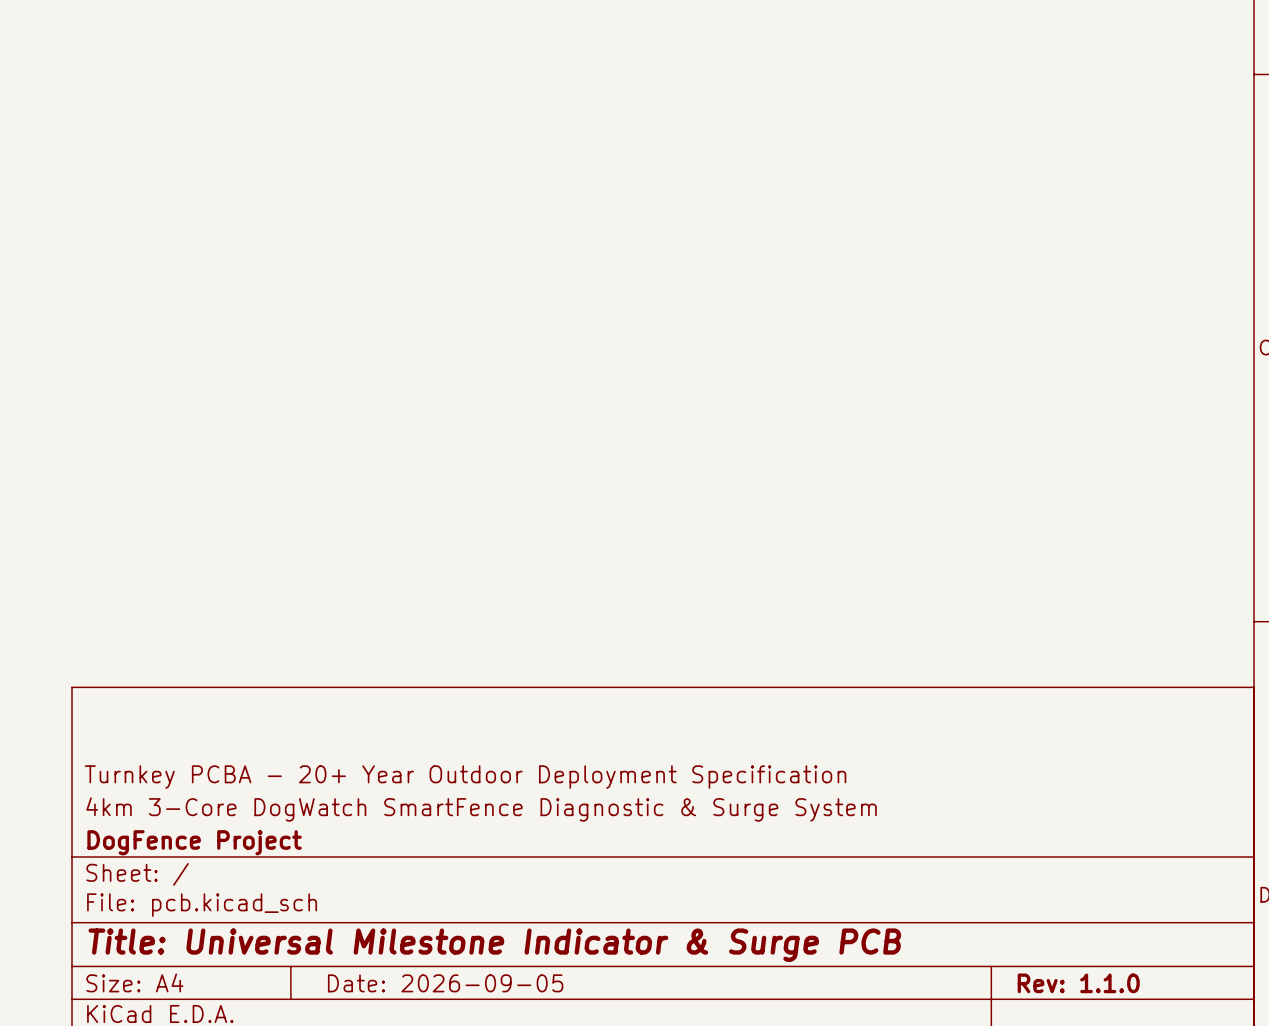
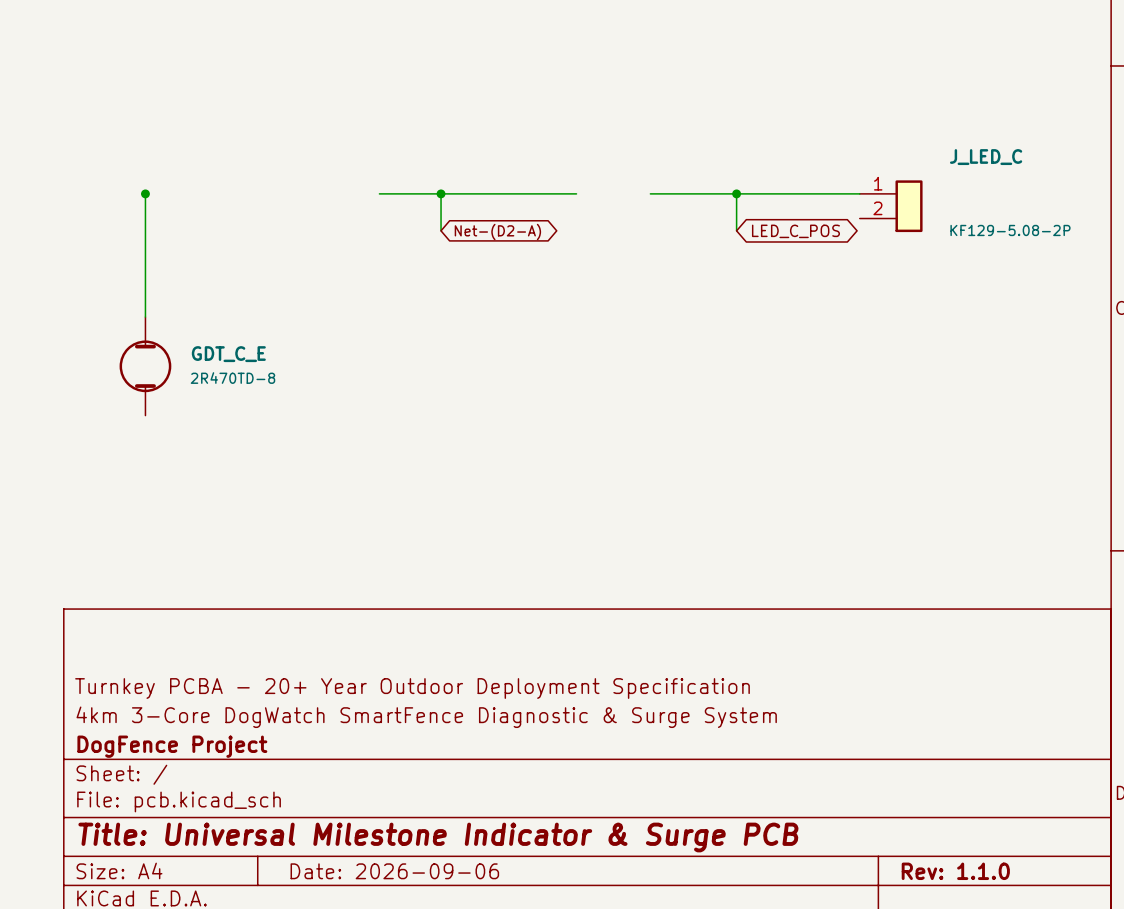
wire: none -> (145, 193) (145, 317)
junction: none -> (145, 193)
wire: none -> (379, 193) (576, 193)
wire: none -> (441, 193) (441, 230)
junction: none -> (441, 193)
wire: none -> (650, 193) (859, 193)
wire: none -> (736, 193) (736, 230)
junction: none -> (736, 193)
J_LED_C: none -> KF129-5.08-2P (891, 206)
global label: none -> Net-(D2-A) (497, 232)
global label: none -> LED_C_POS (795, 231)
GDT_C_E: none -> 2R470TD-8 (145, 366)
title block: Date: 2026-09-05 (445, 983) -> Date: 2026-09-06 (394, 871)

